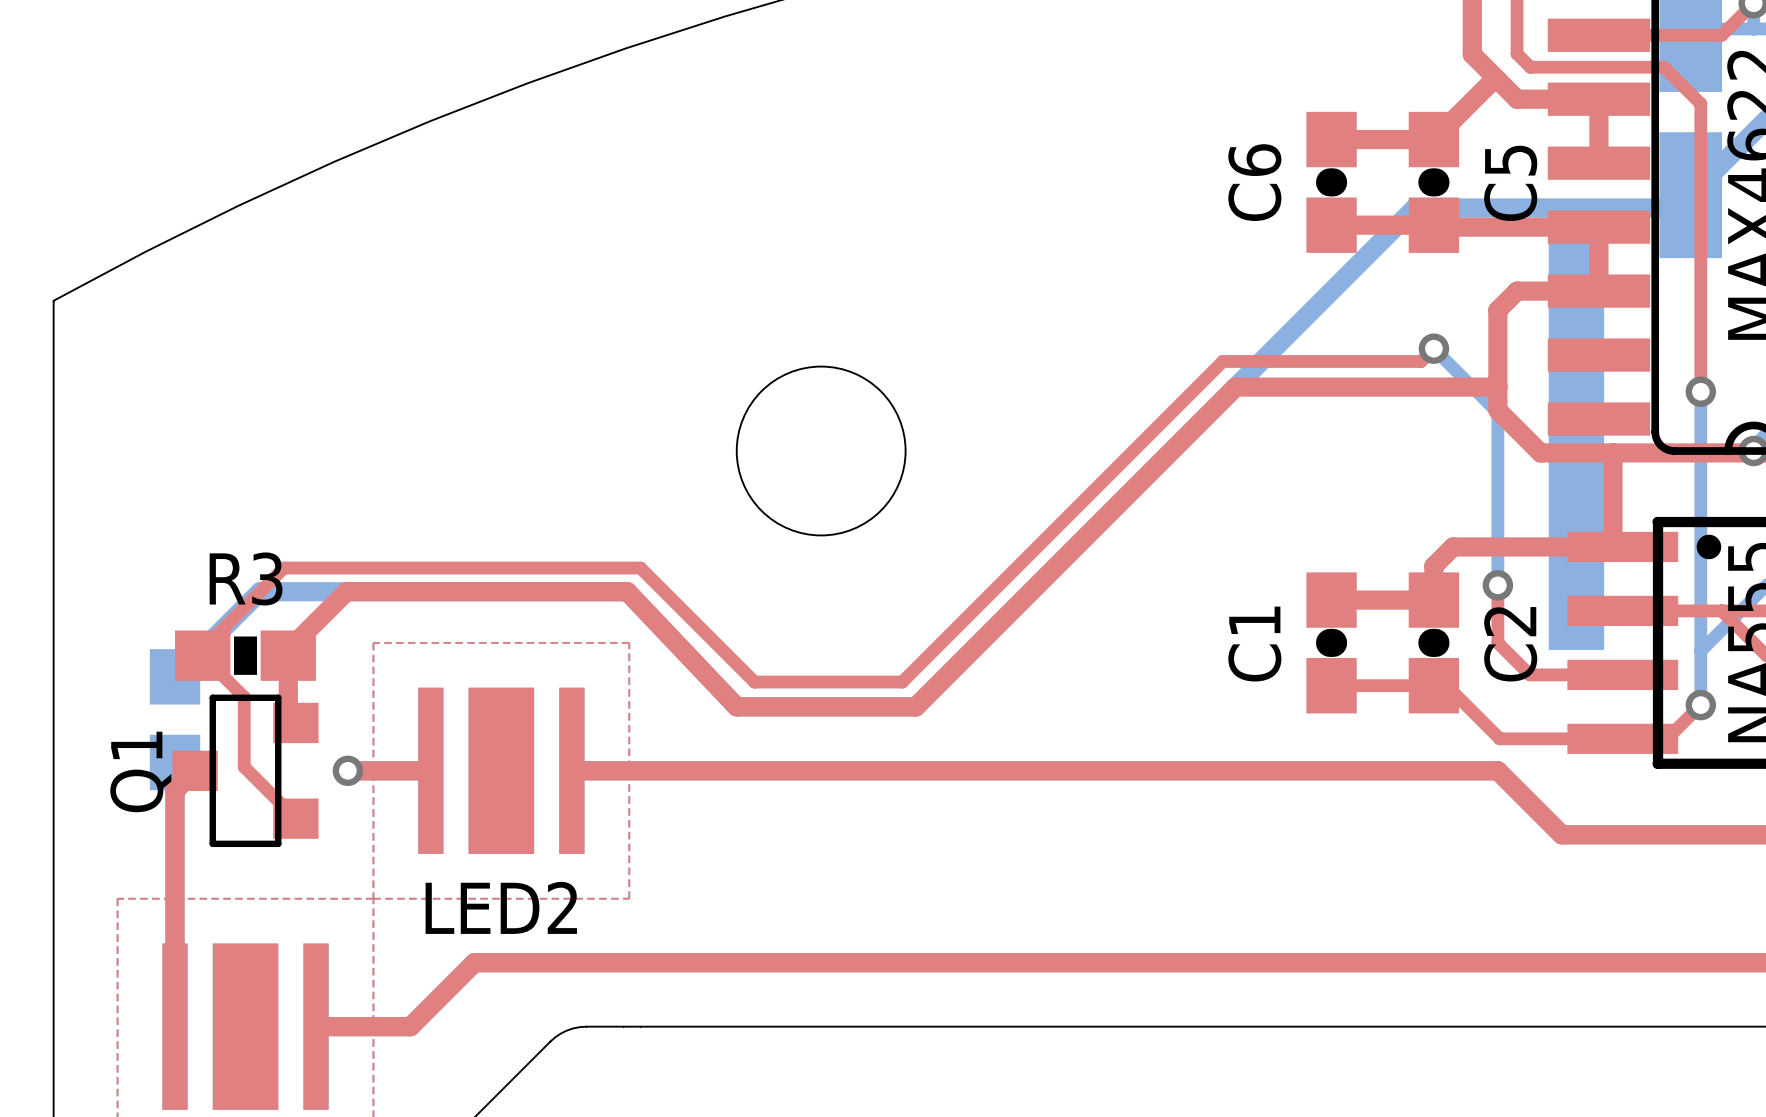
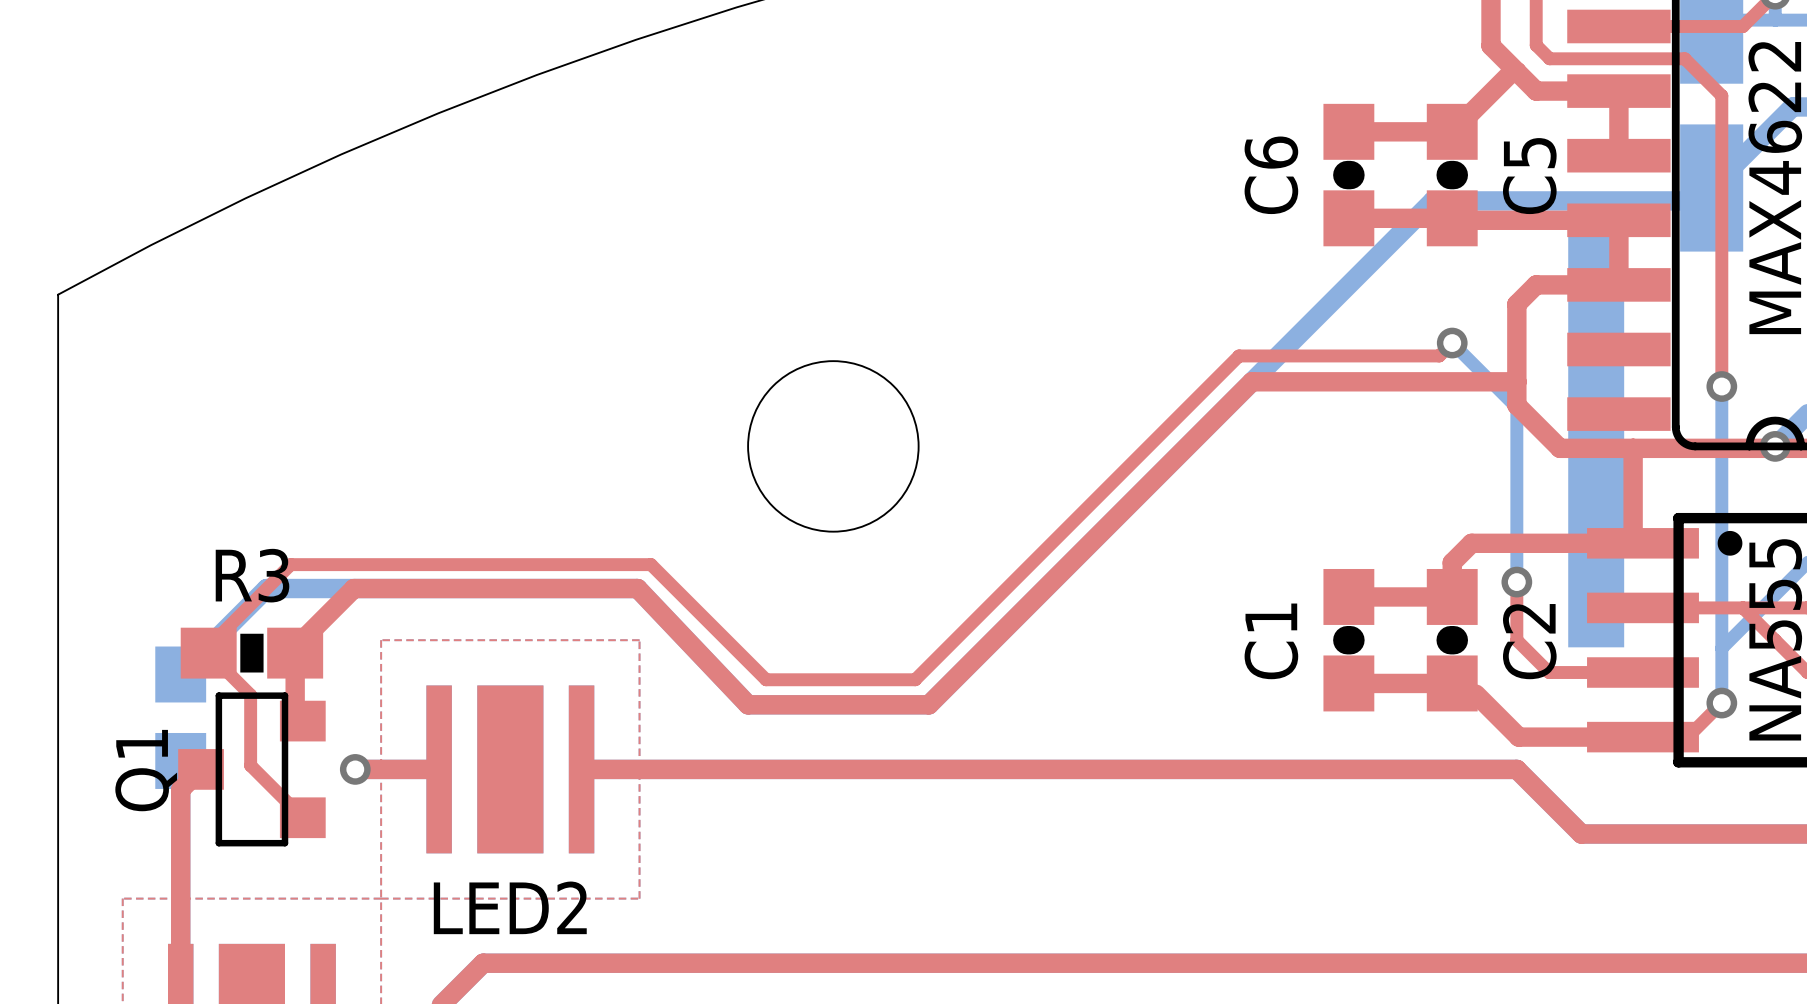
top track width: thin (1331, 685) (1433, 685) -> thick (1348, 683) (1452, 683)
top track width: thin (1457, 696) (1499, 738) (1622, 738) -> thick (1475, 694) (1518, 737) (1642, 737)

